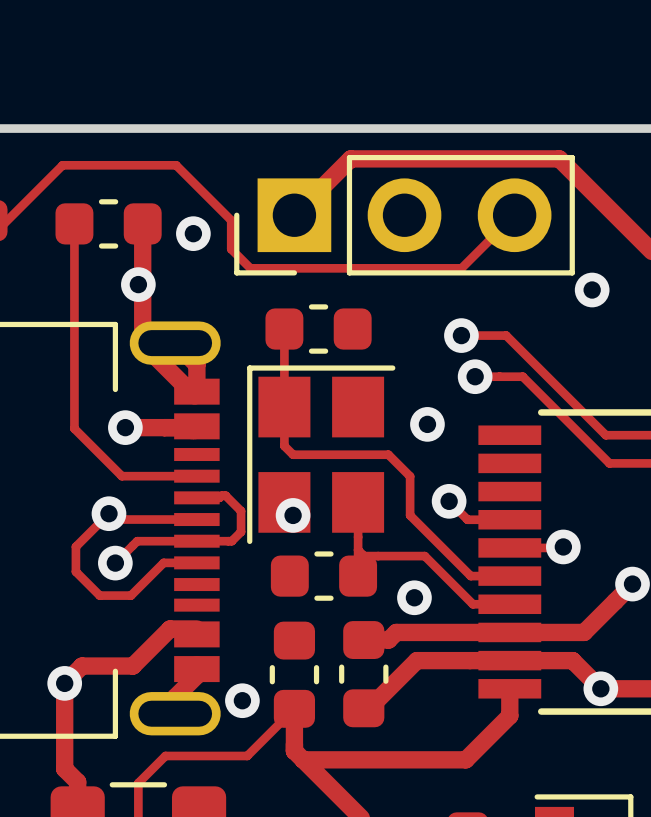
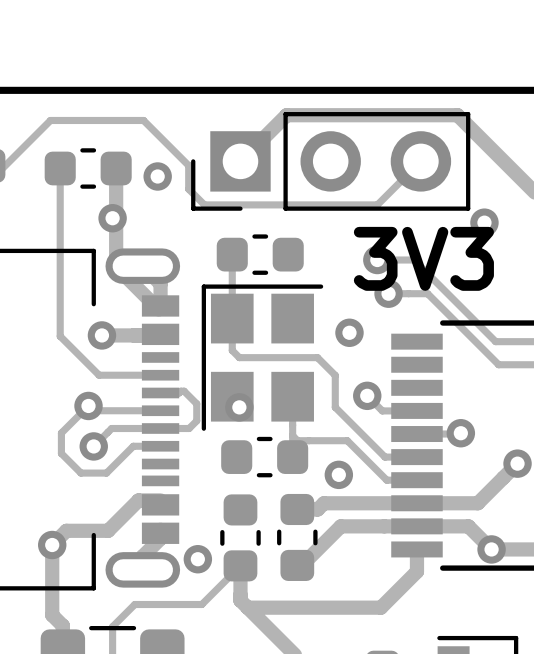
text: none -> 3V3 (423, 258)

